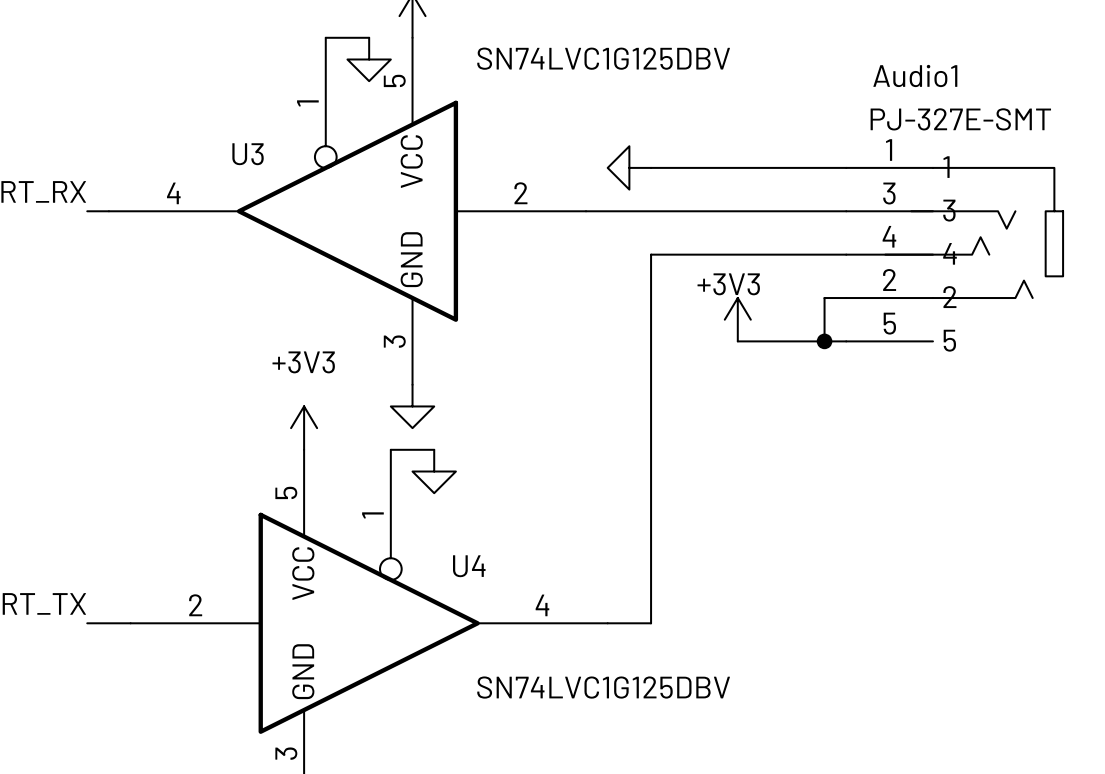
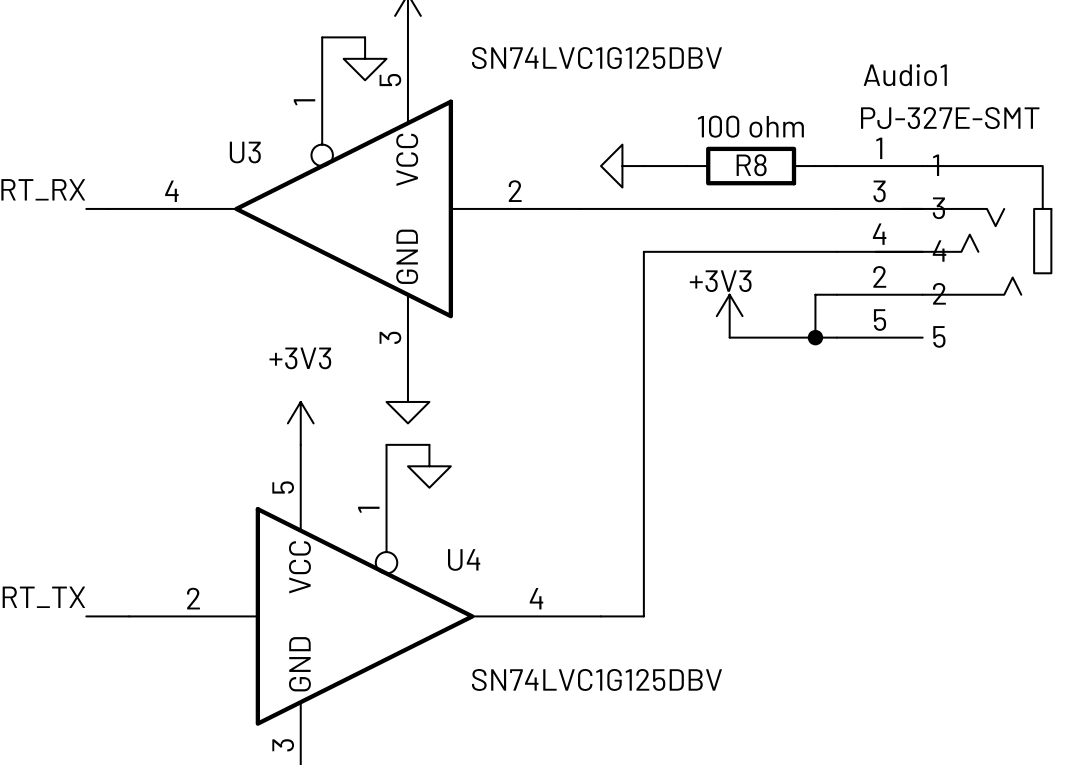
wire: (694, 167) (824, 167) -> none
R8: none -> 100 ohm (751, 166)

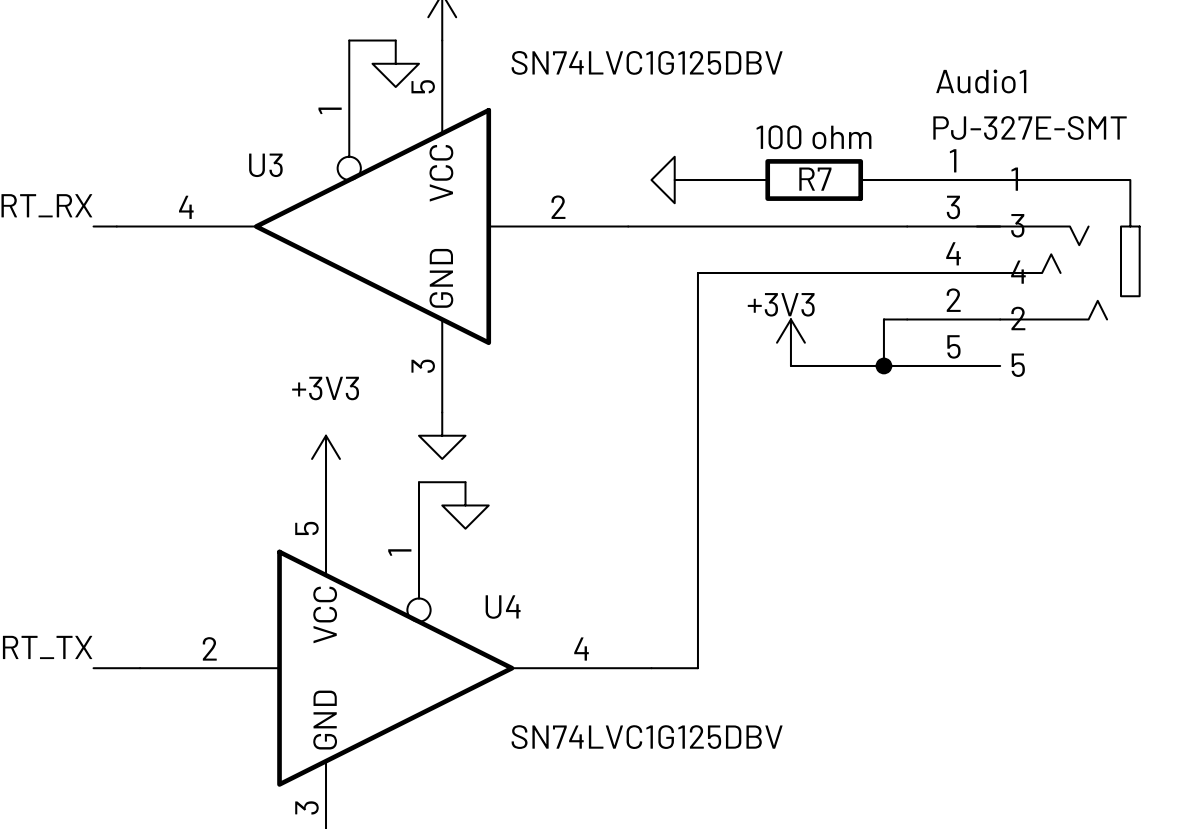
R8 name: R8 (751, 165) -> R7 (815, 179)

